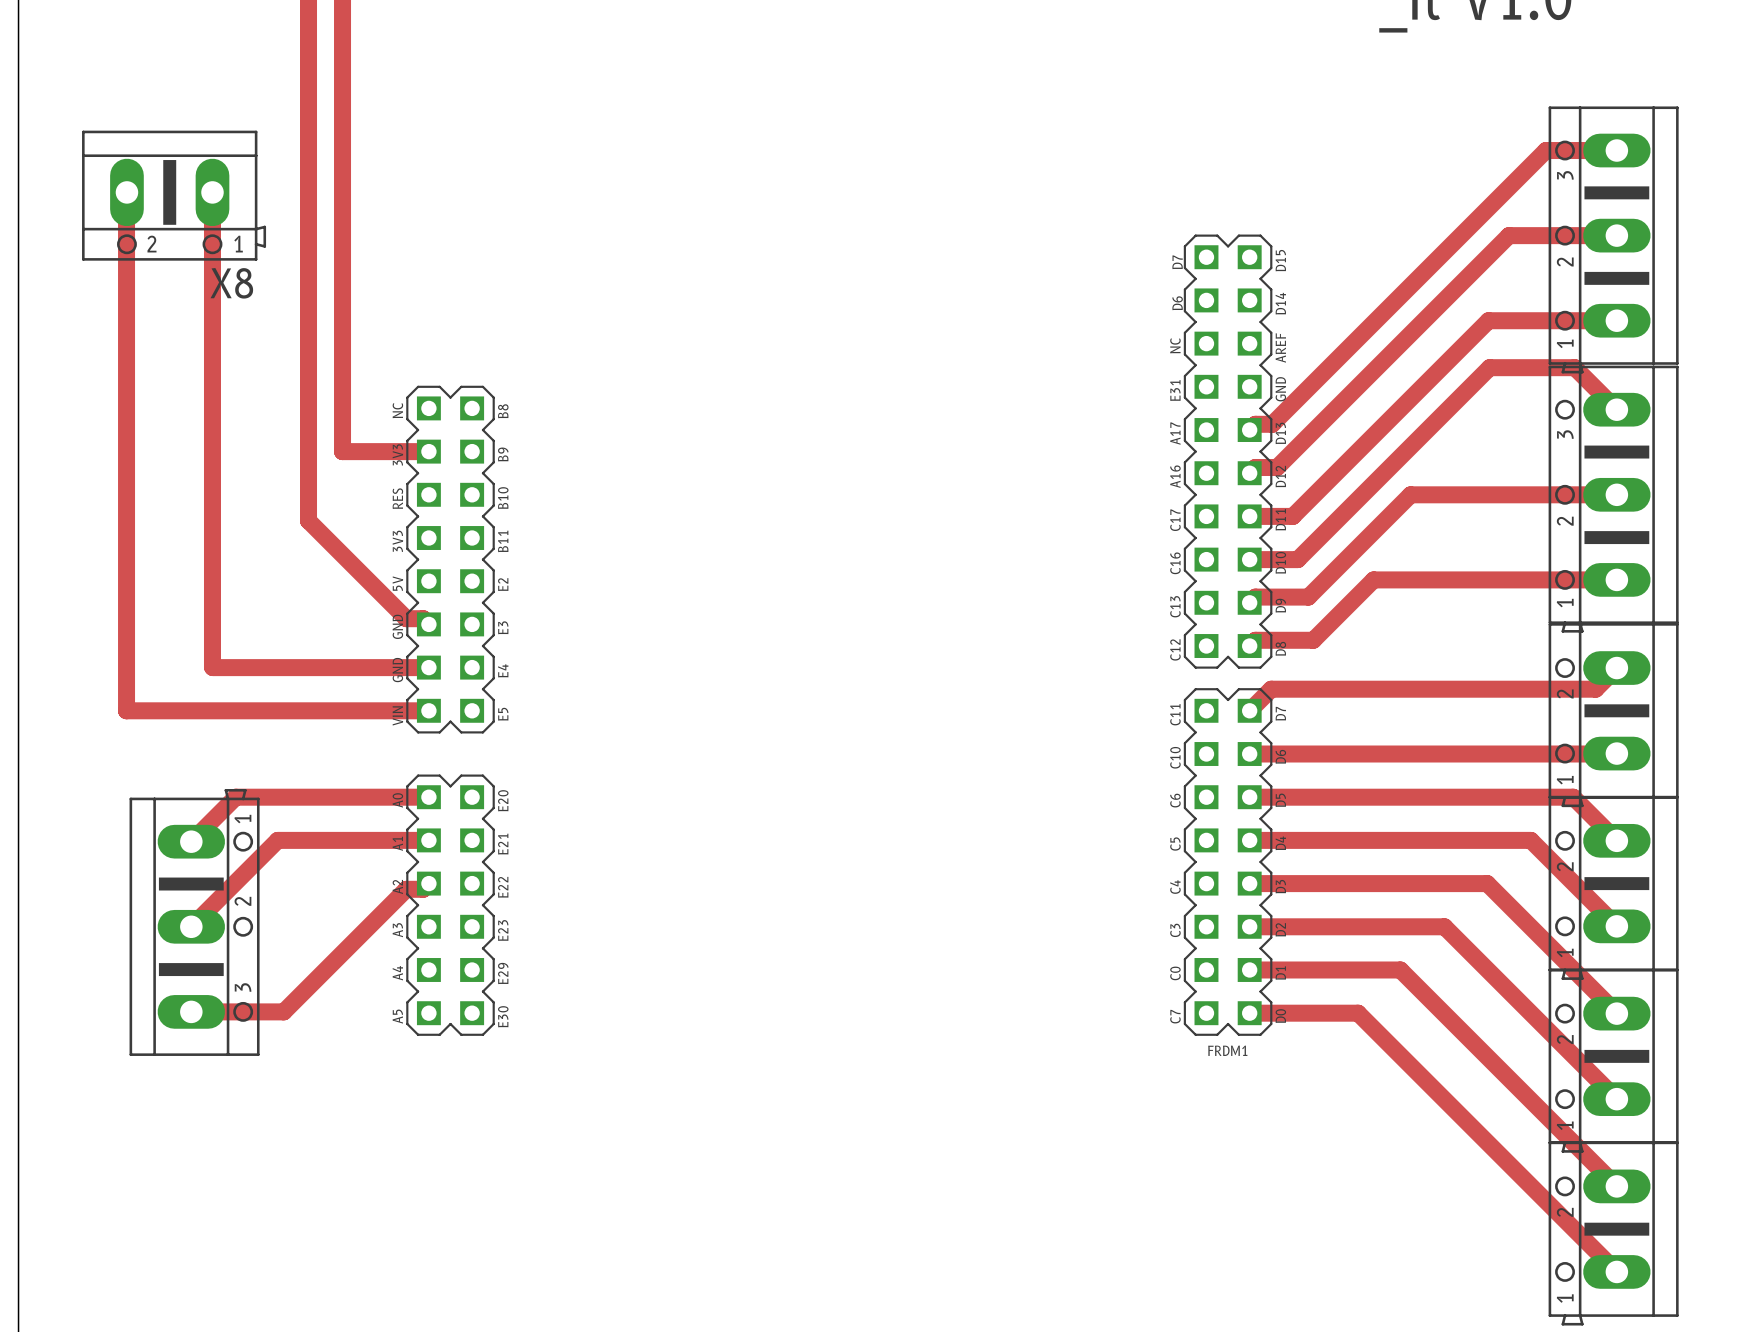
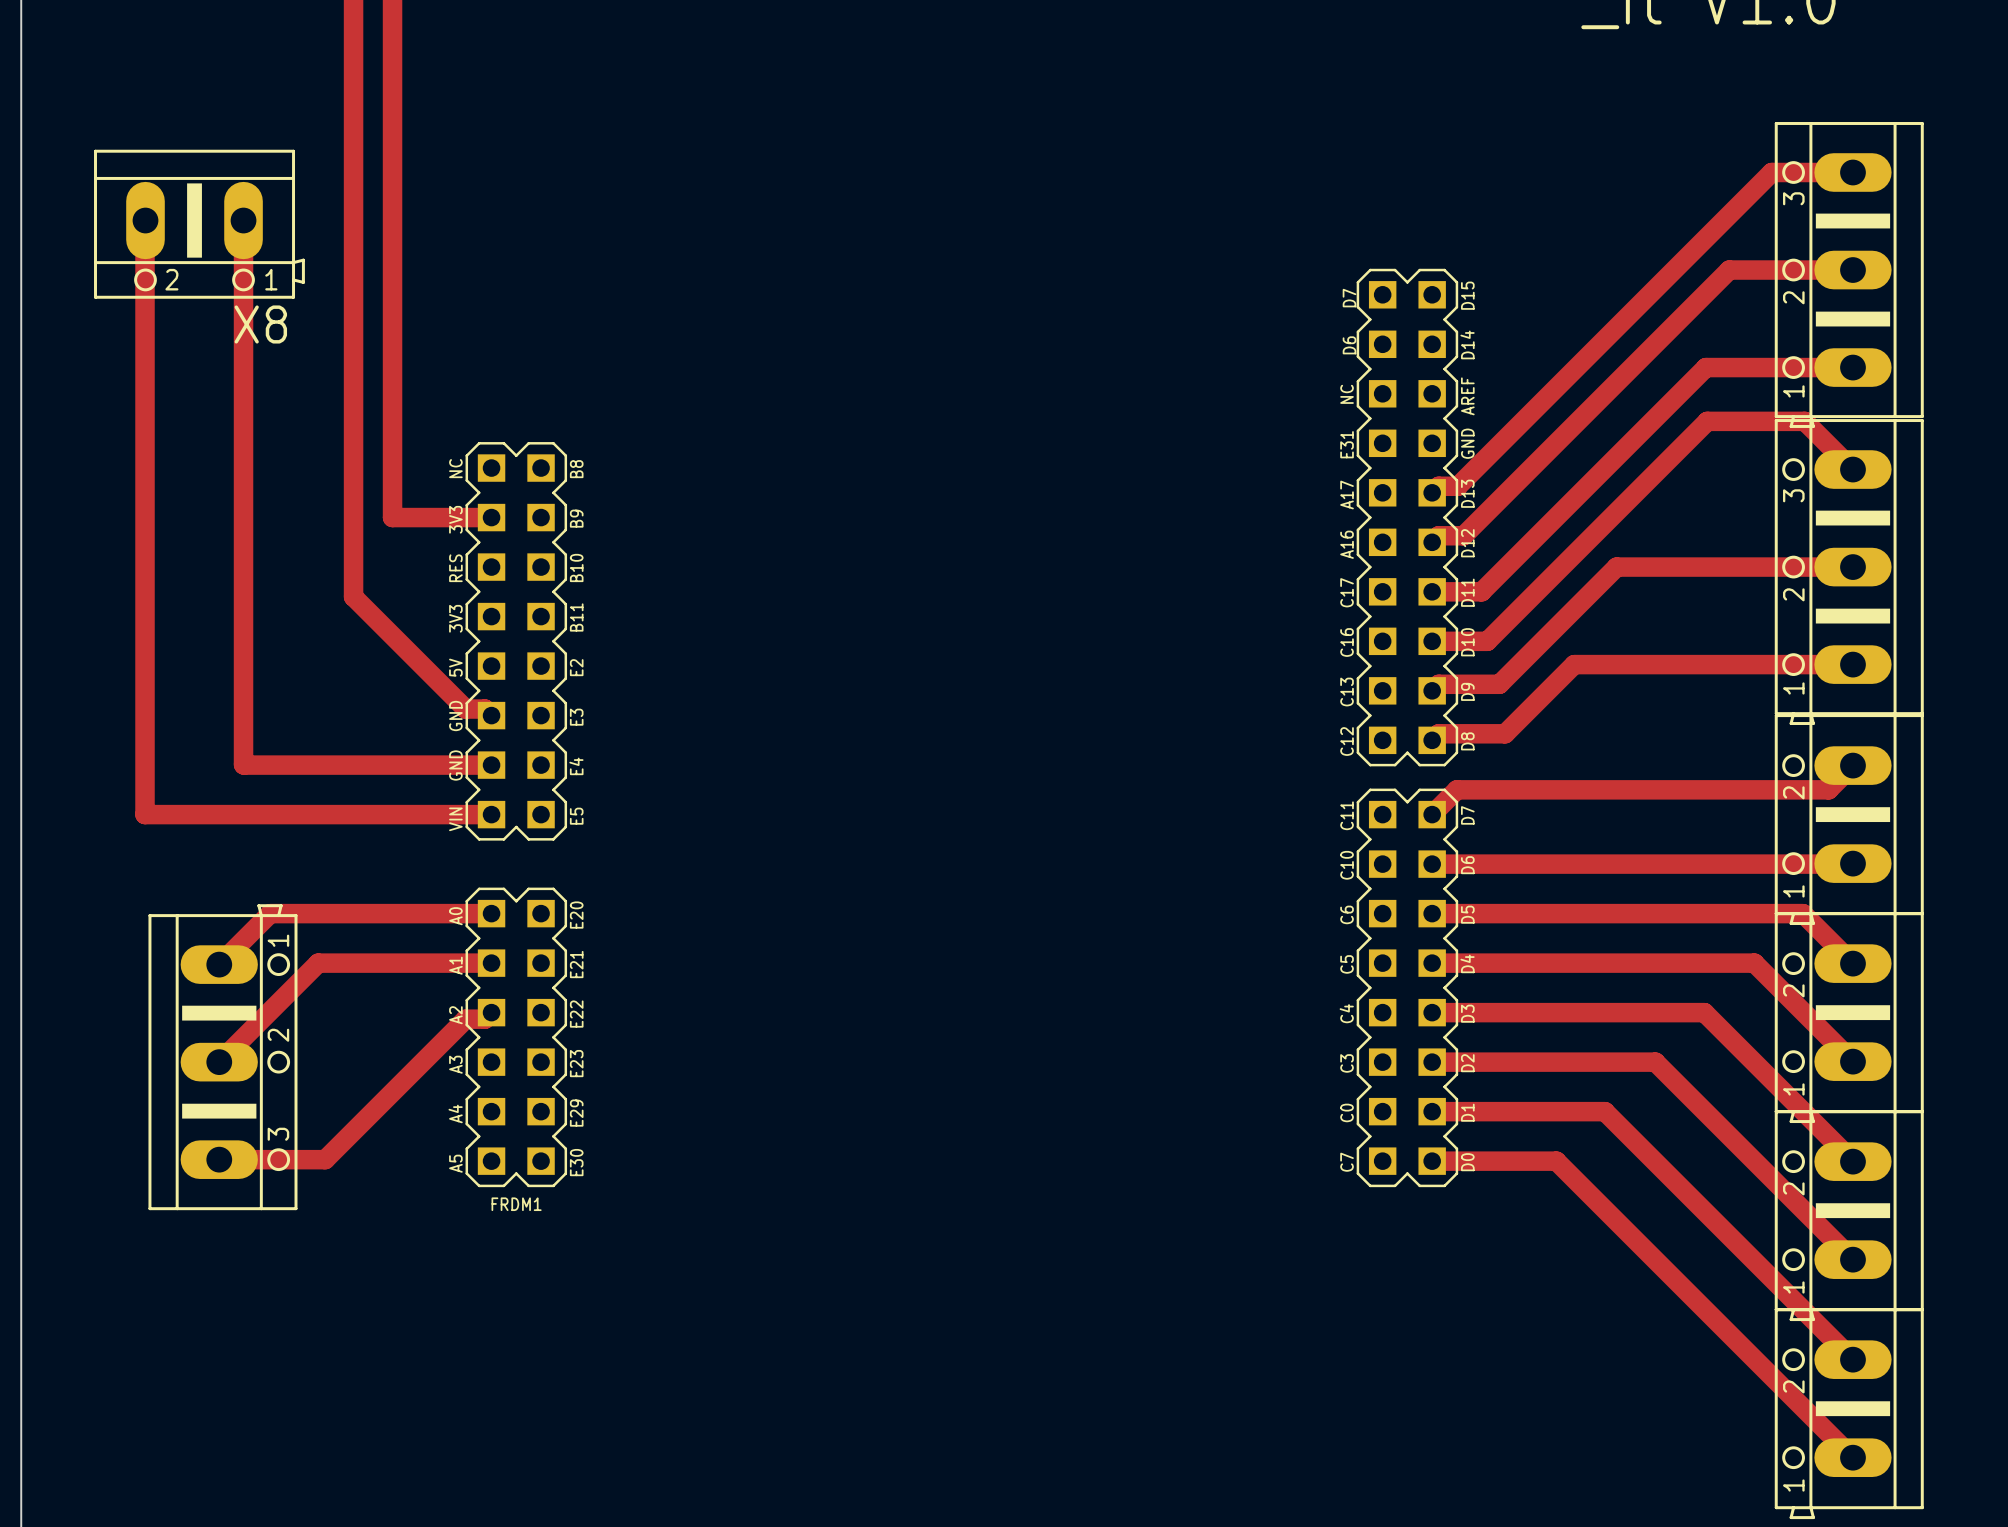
FRDM1 name position: FRDM1 (1227, 1050) -> FRDM1 (516, 1204)

